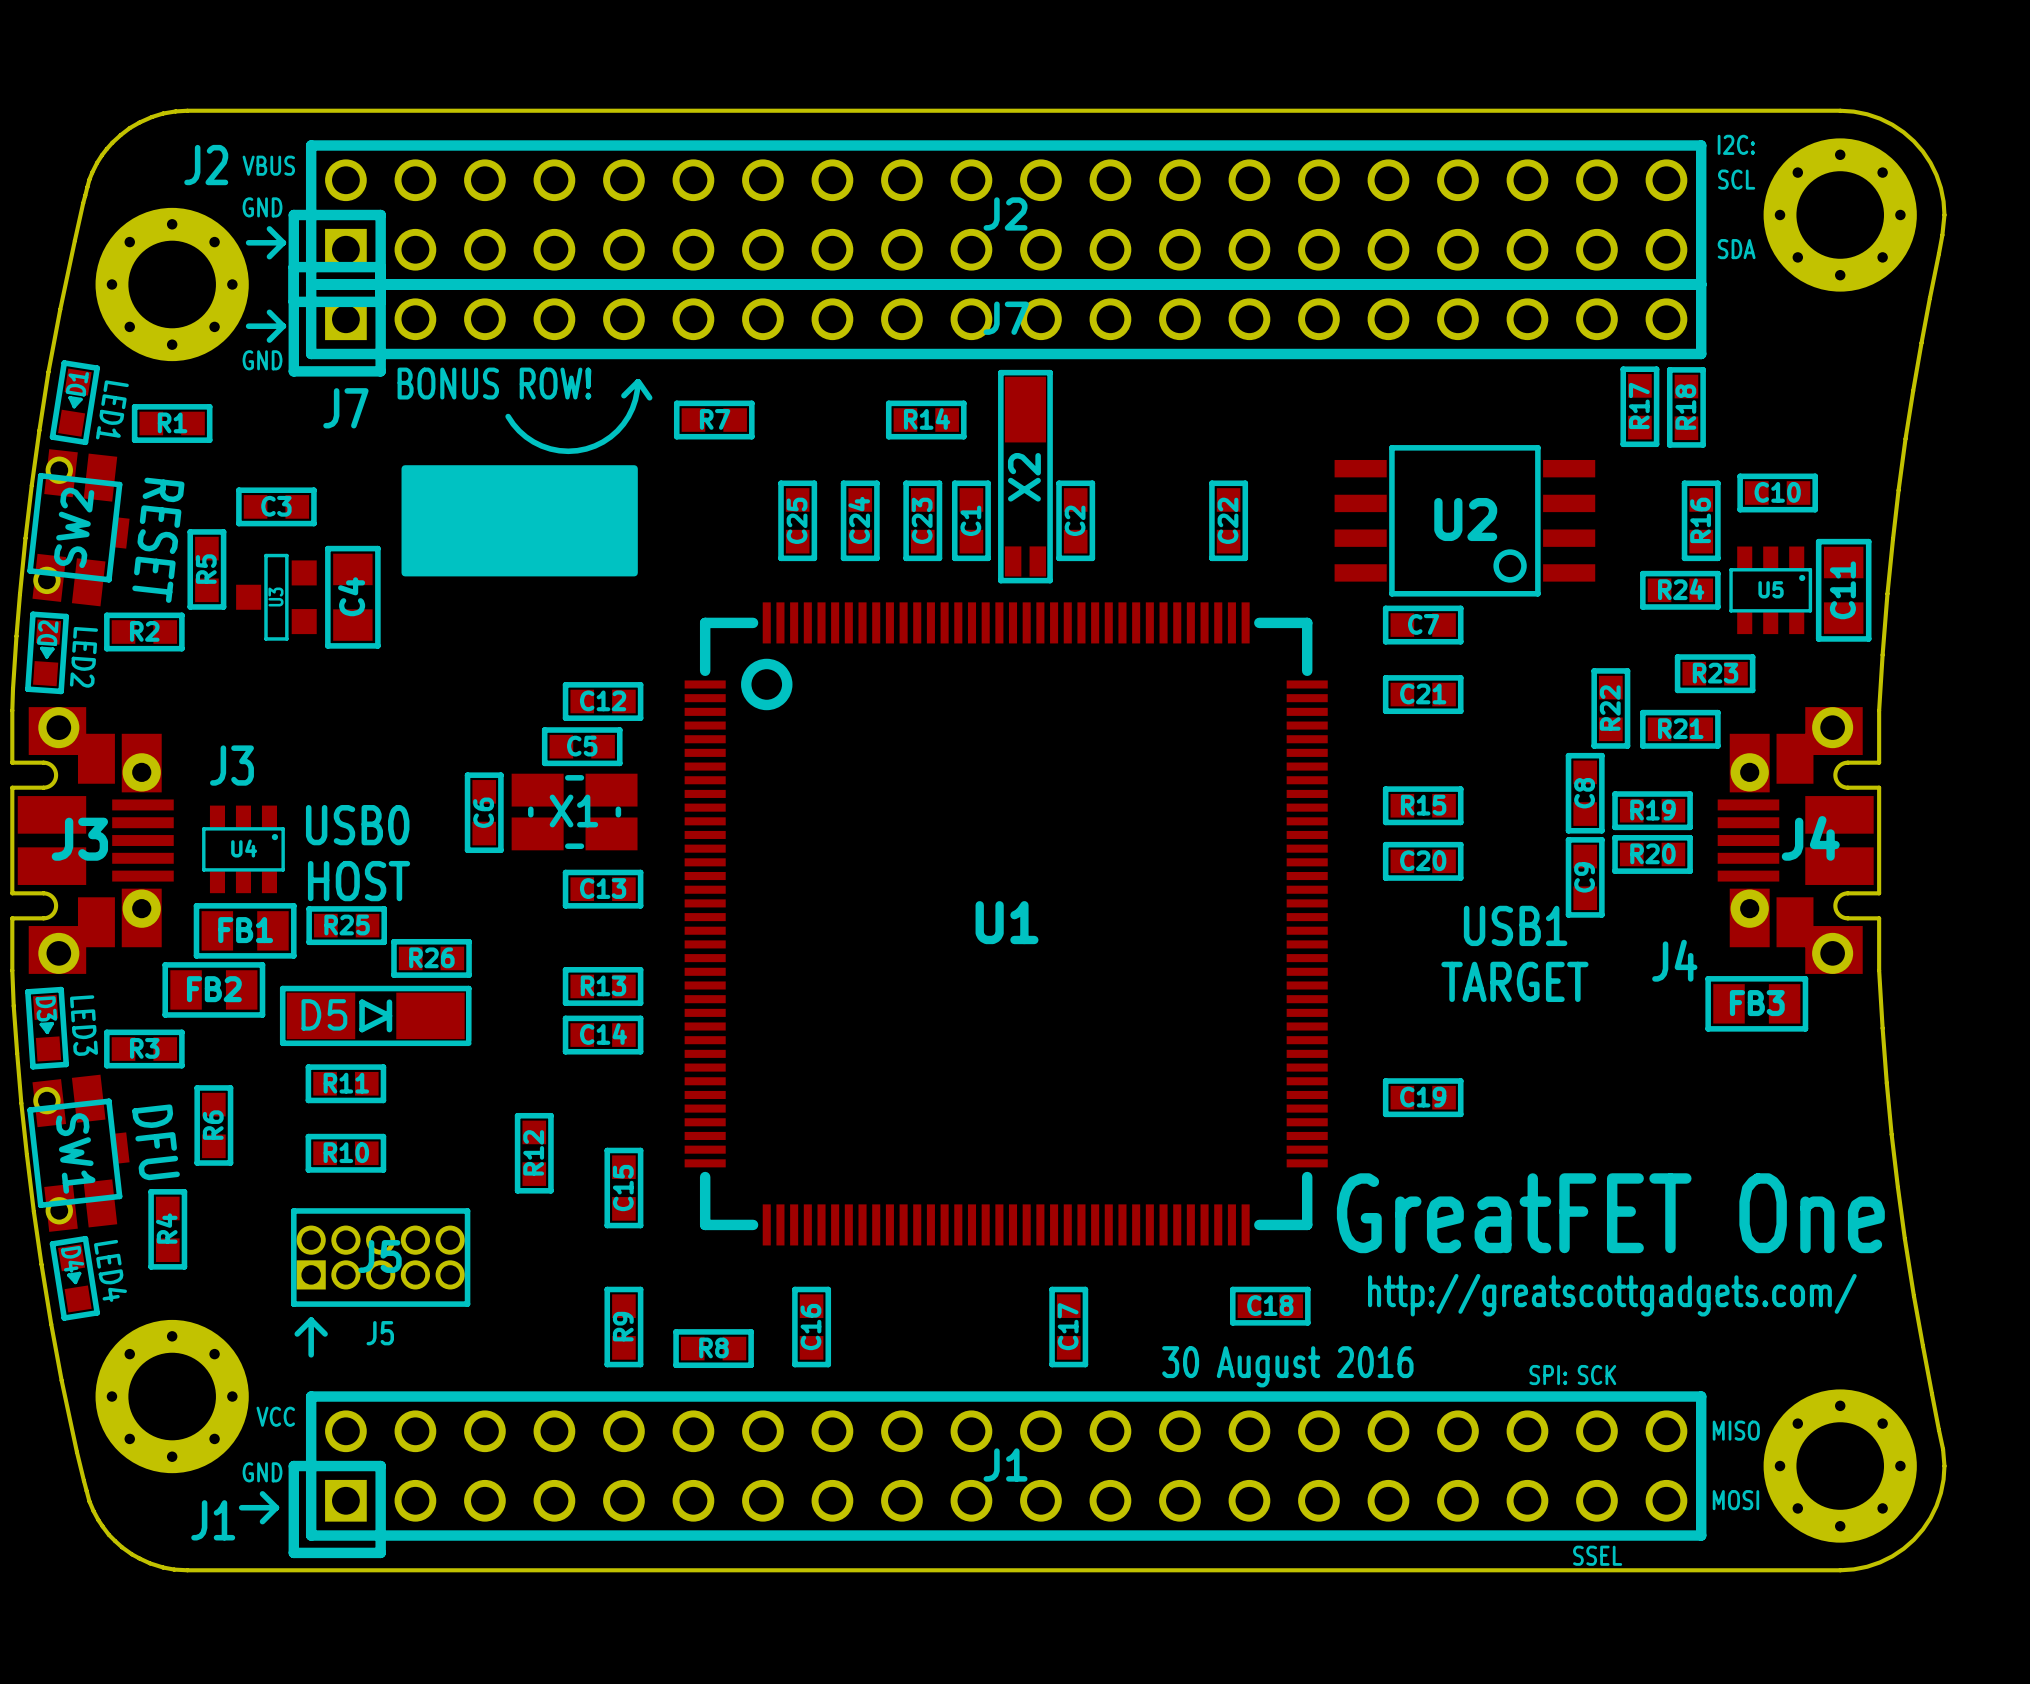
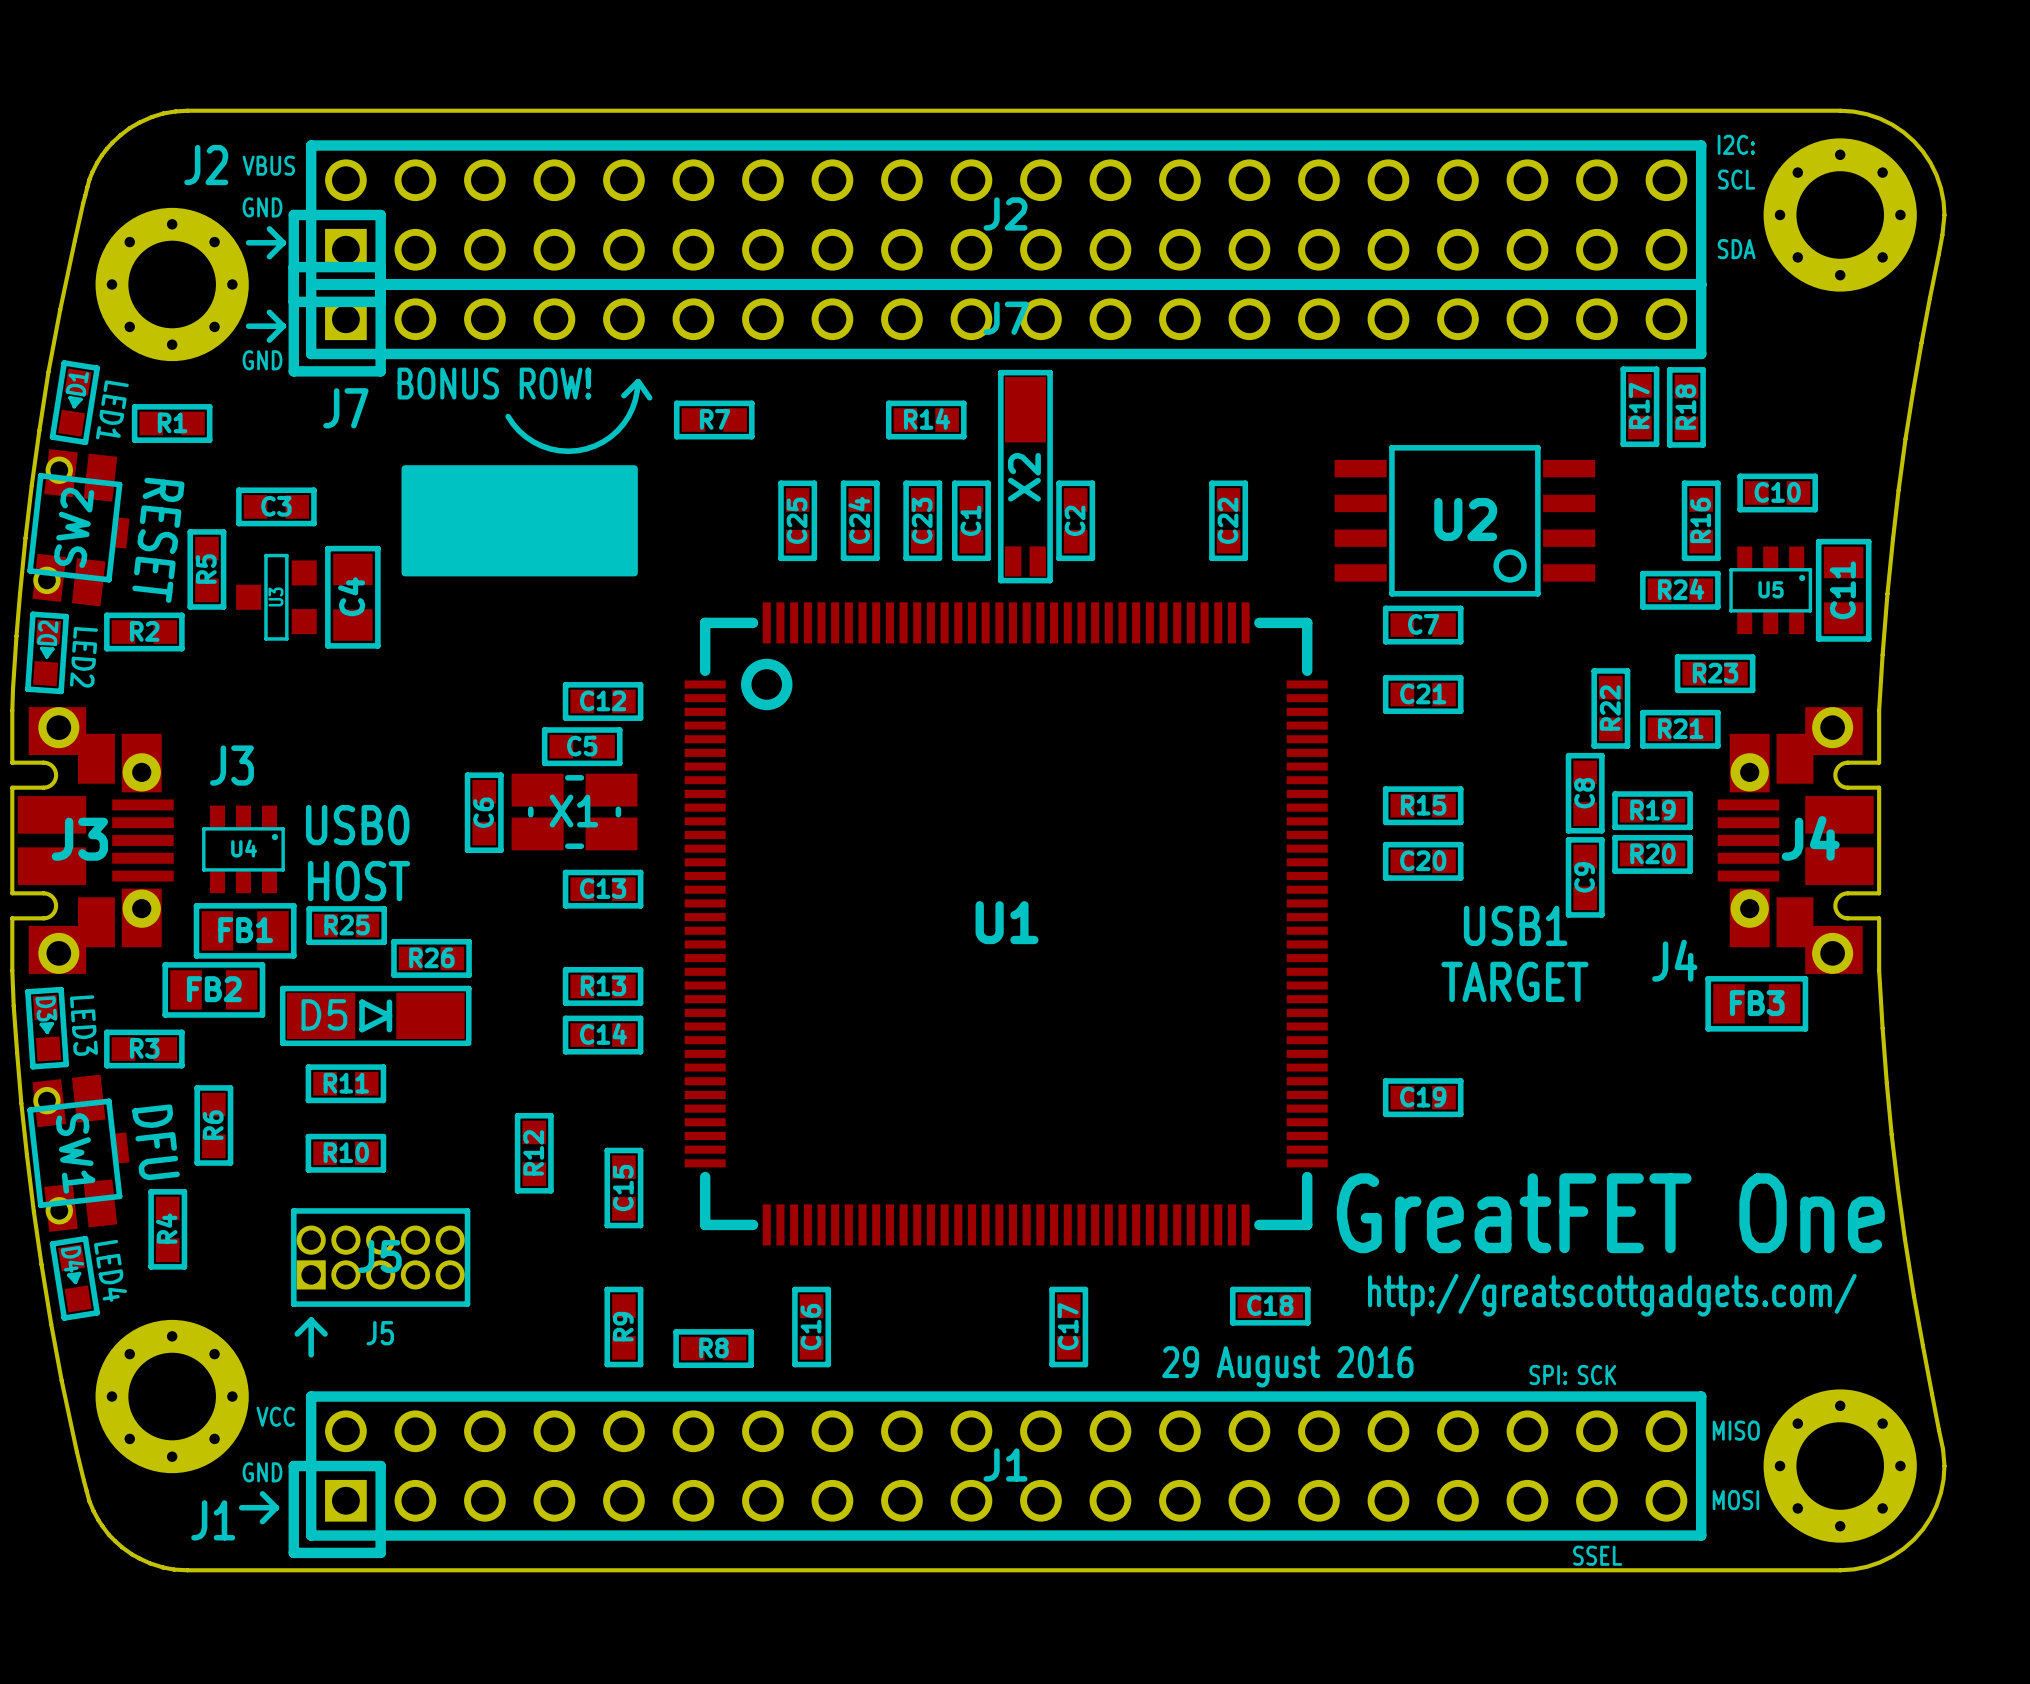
text: 30 August 2016 (1287, 1366) -> 29 August 2016 (1287, 1366)

